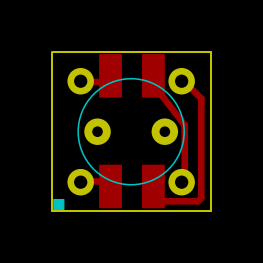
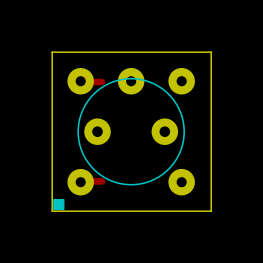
part footprint: [67, 67, 195, 196] -> [67, 67, 195, 196]
track: (191, 88) (201, 98) (201, 197) (197, 201) (161, 201) -> none
track: (161, 95) (184, 125) (184, 171) -> none
part: (131, 131) -> none

